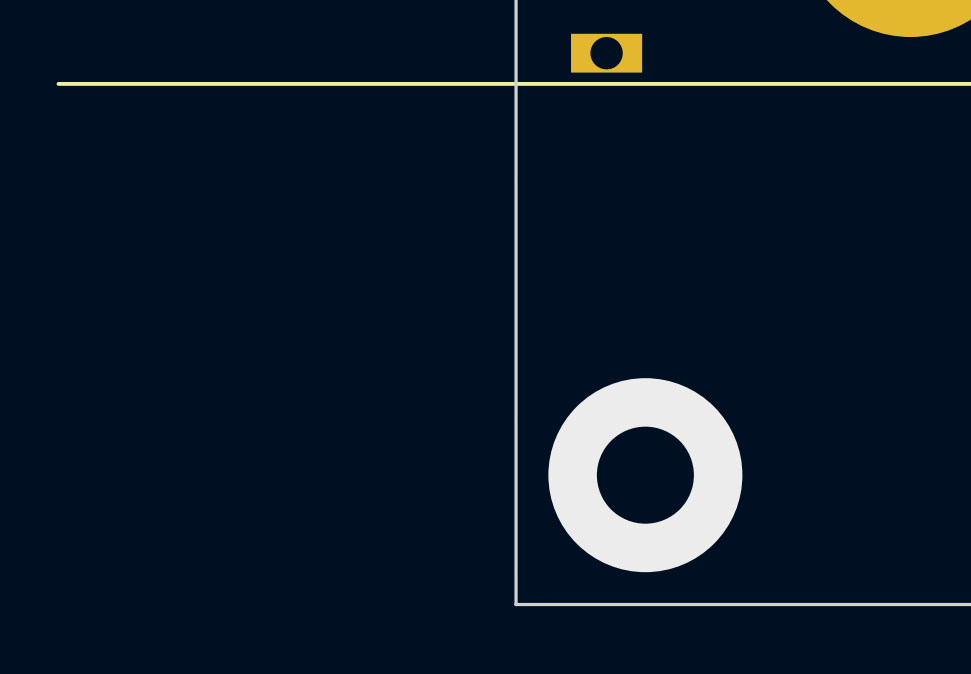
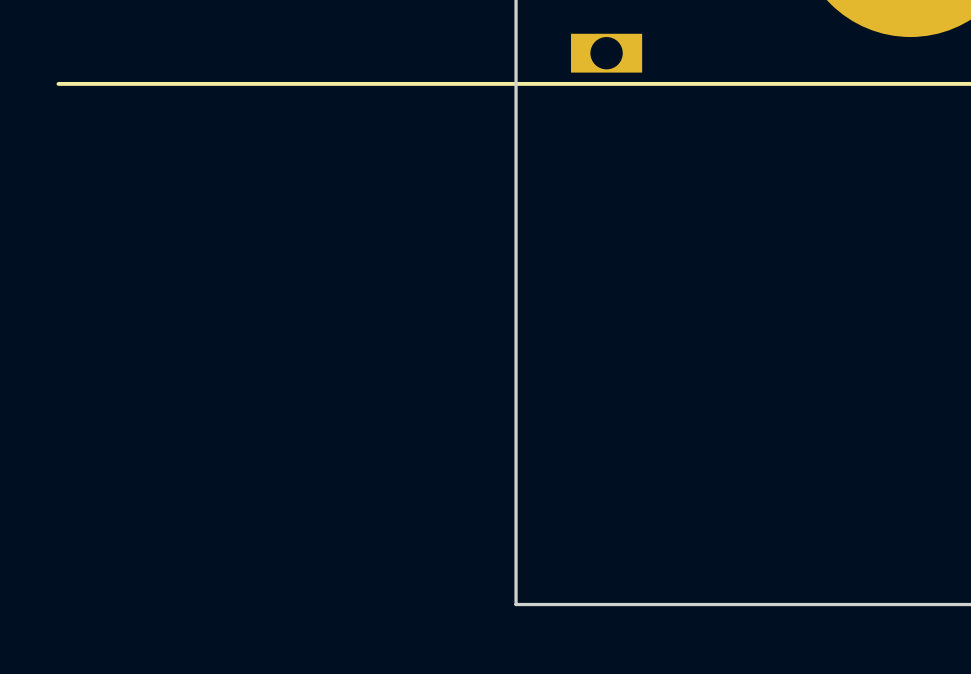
via: (645, 475) -> none

